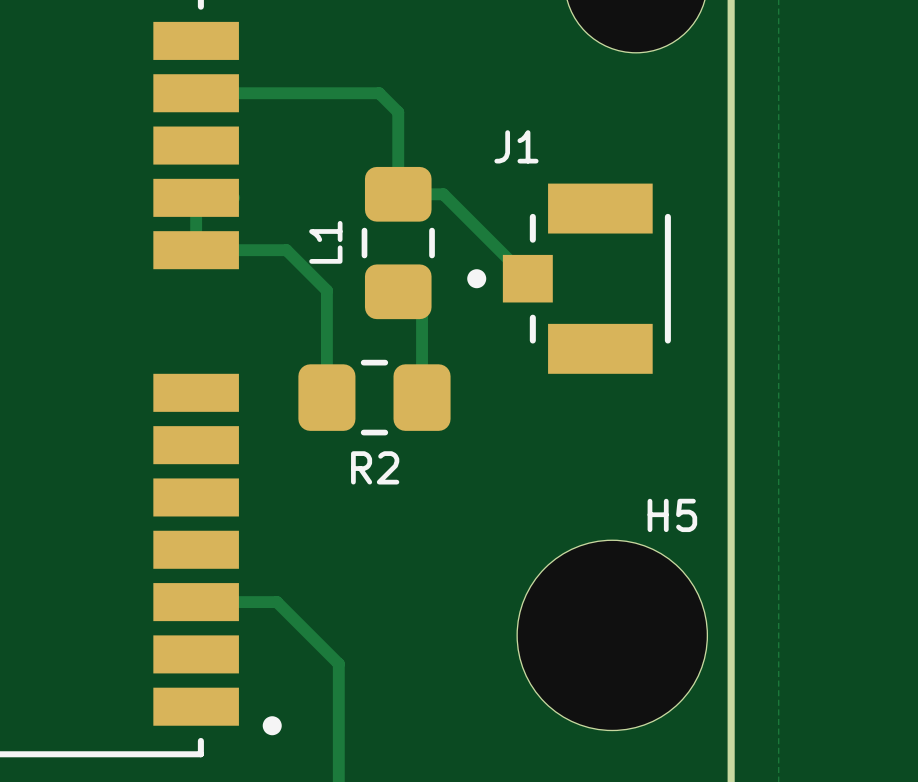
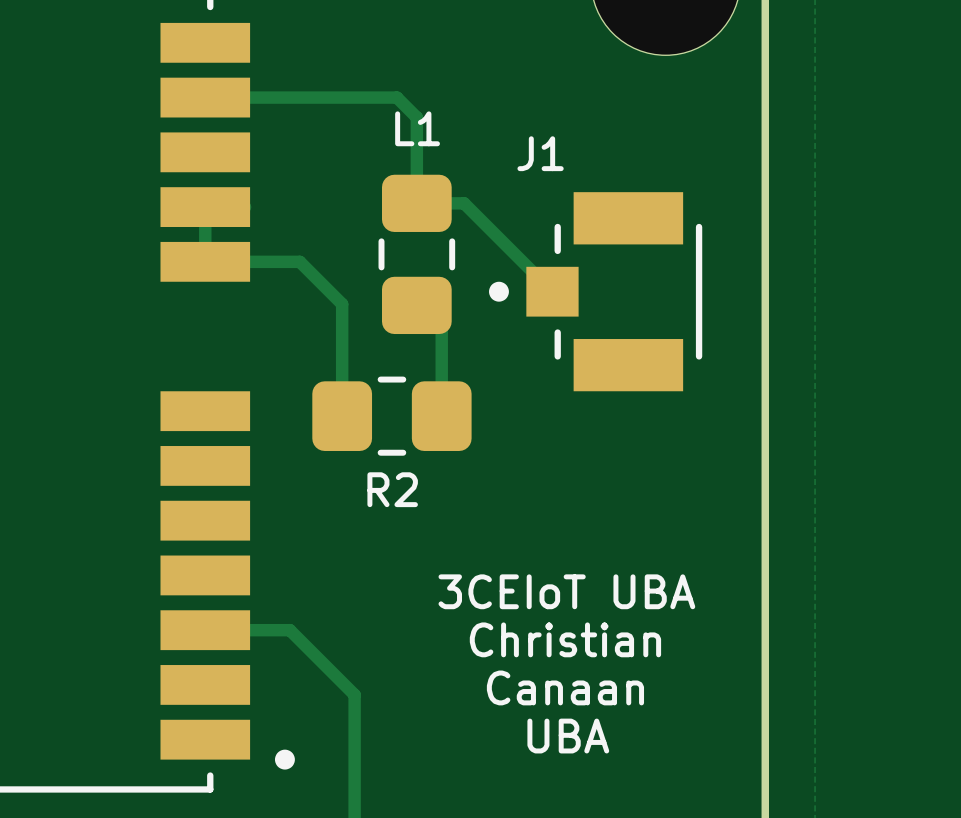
L1 name rotation: 0° (325, 242) -> 90° clockwise (417, 128)
L1 name position: L1 (325, 242) -> L1 (417, 128)
text: none -> 3CEIoT UBA (566, 591)
text: none -> Christian (565, 639)
H5: (612, 635) -> none
text: none -> Canaan (565, 687)
text: none -> UBA (568, 736)

